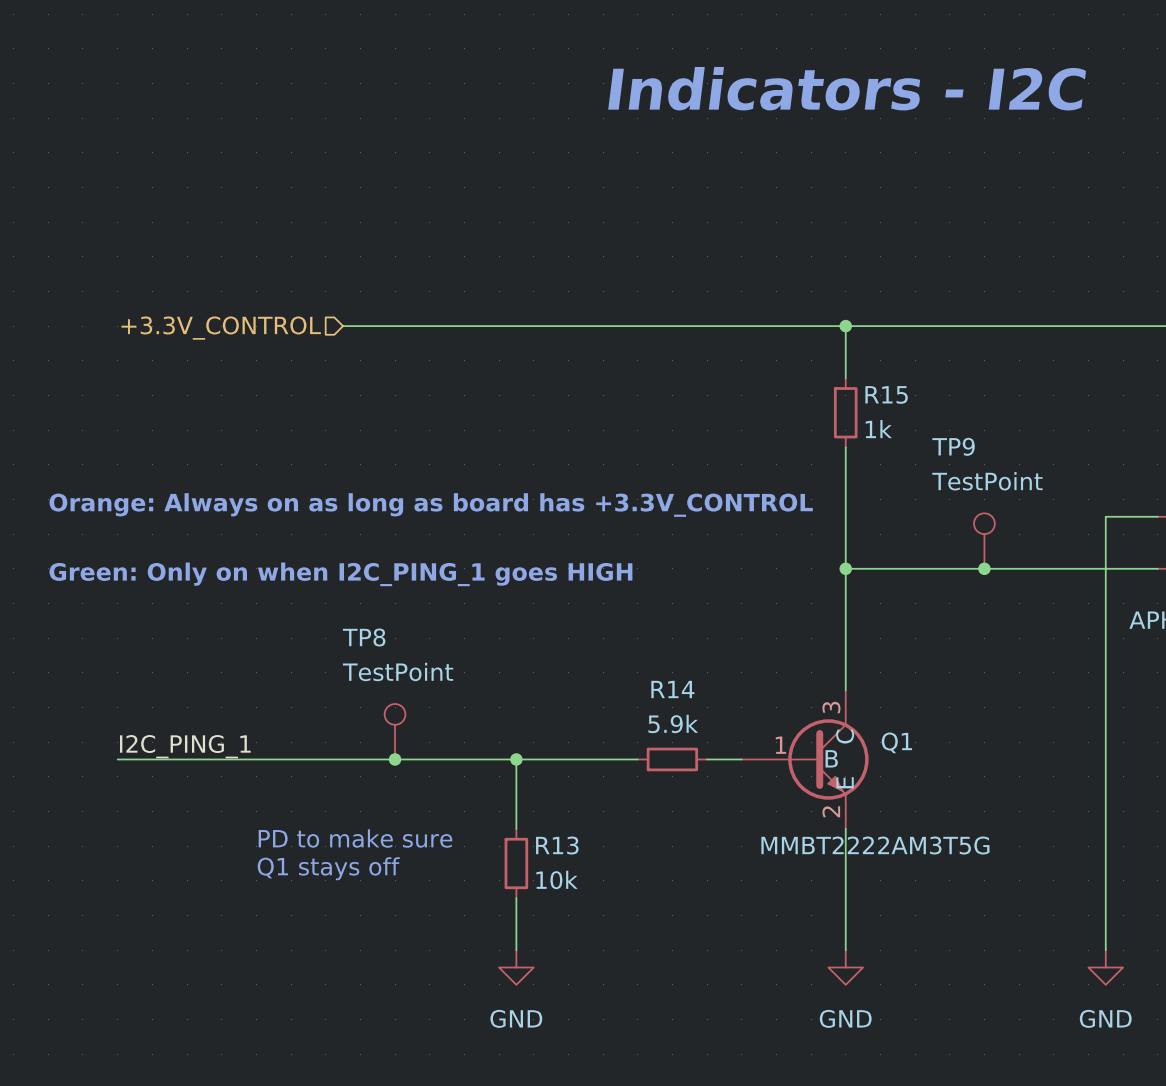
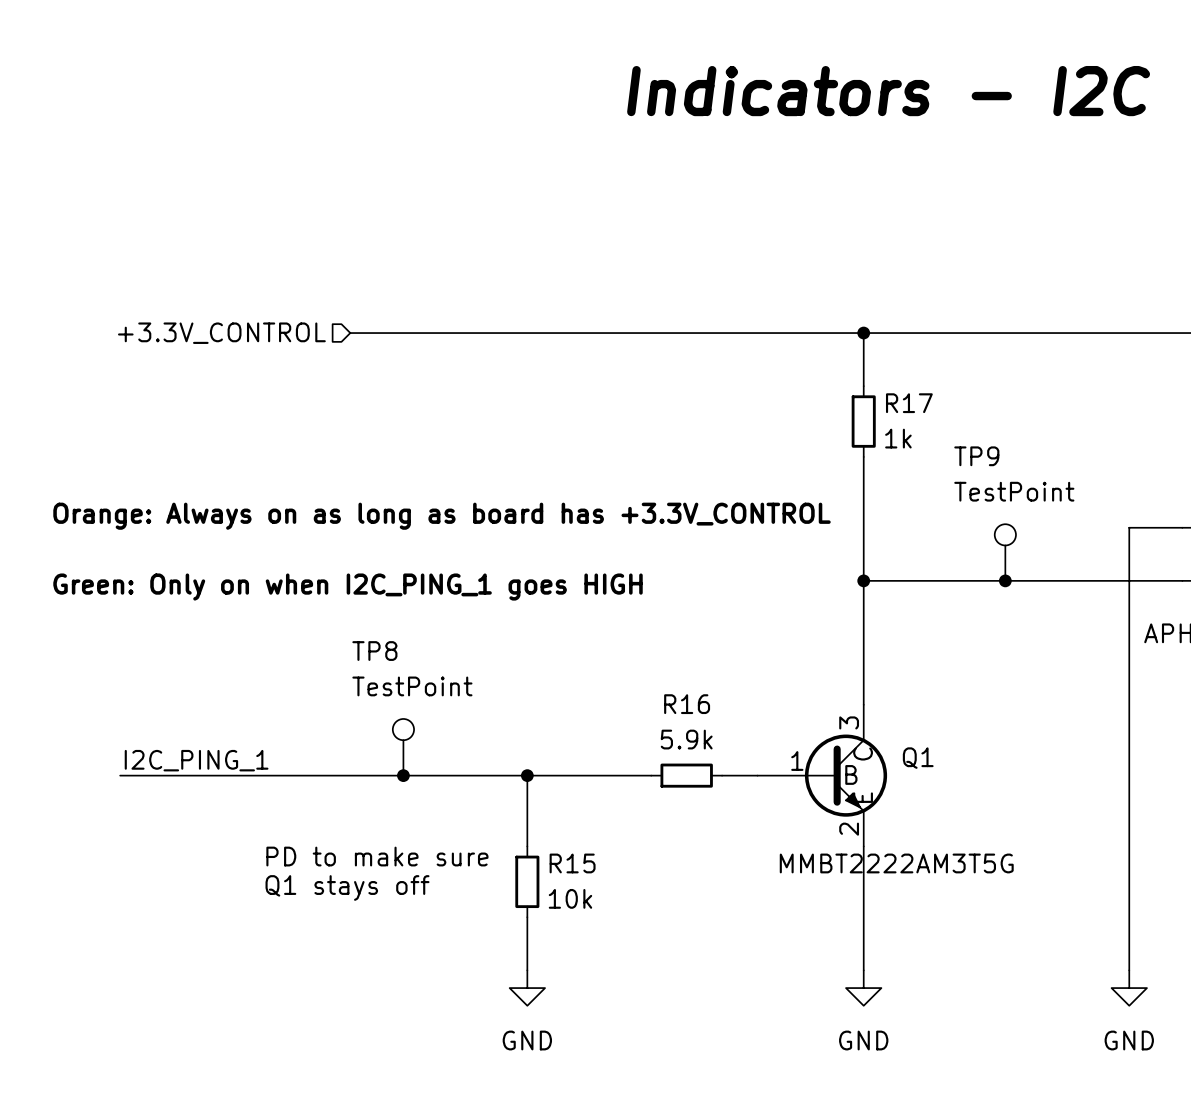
R15 name: R15 (886, 394) -> R17 (909, 403)
R14 name: R14 (672, 689) -> R16 (687, 704)
R13 name: R13 (557, 845) -> R15 (572, 863)

